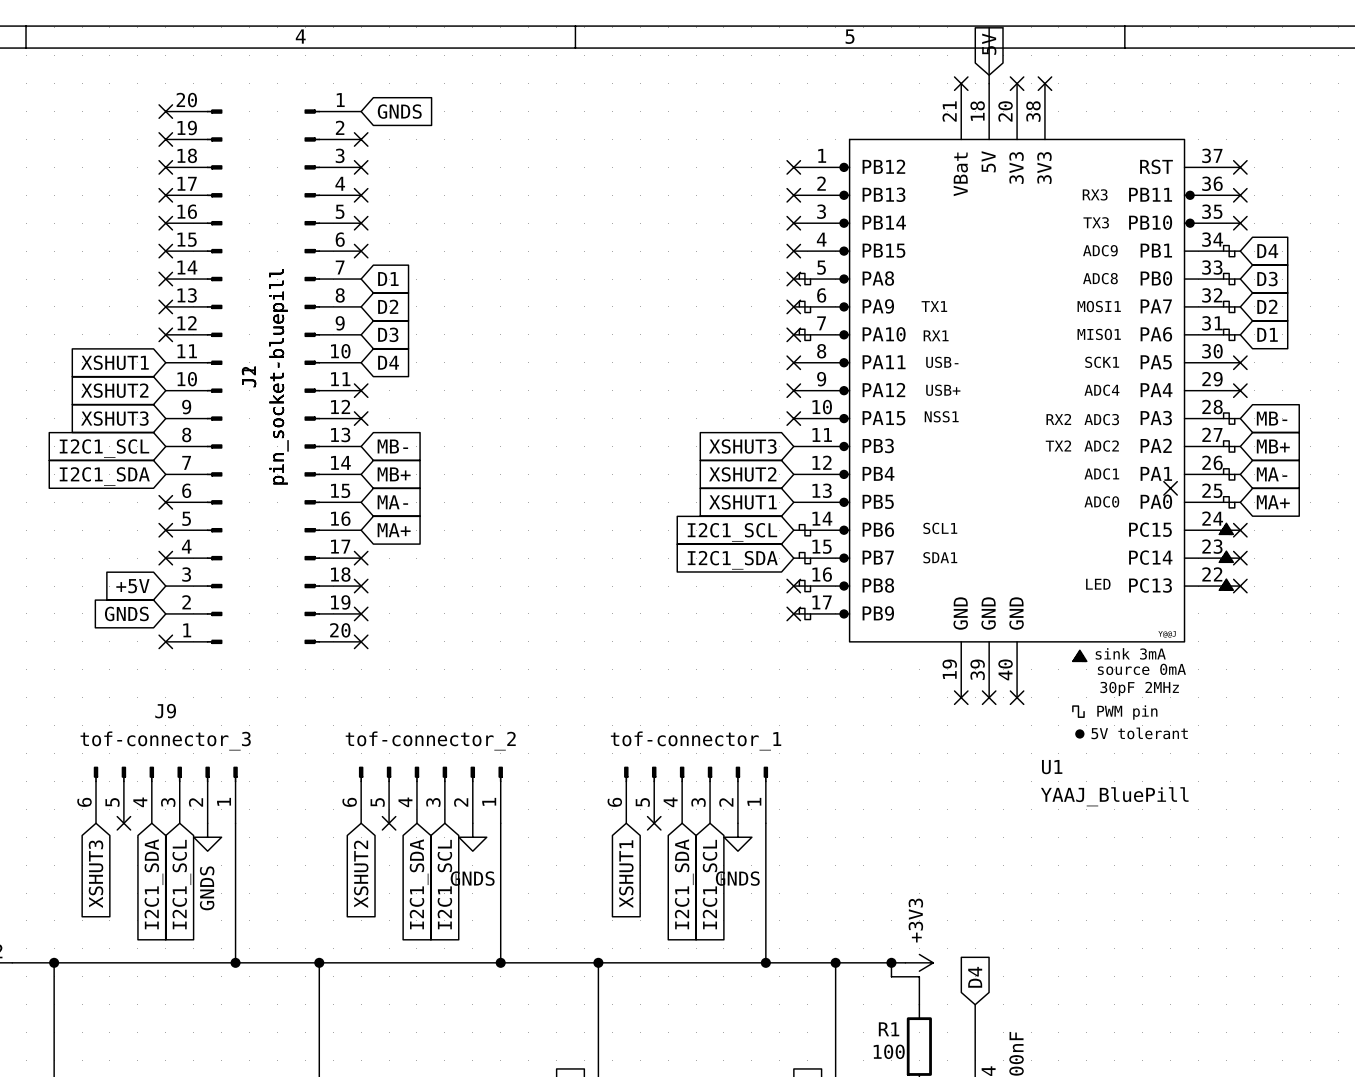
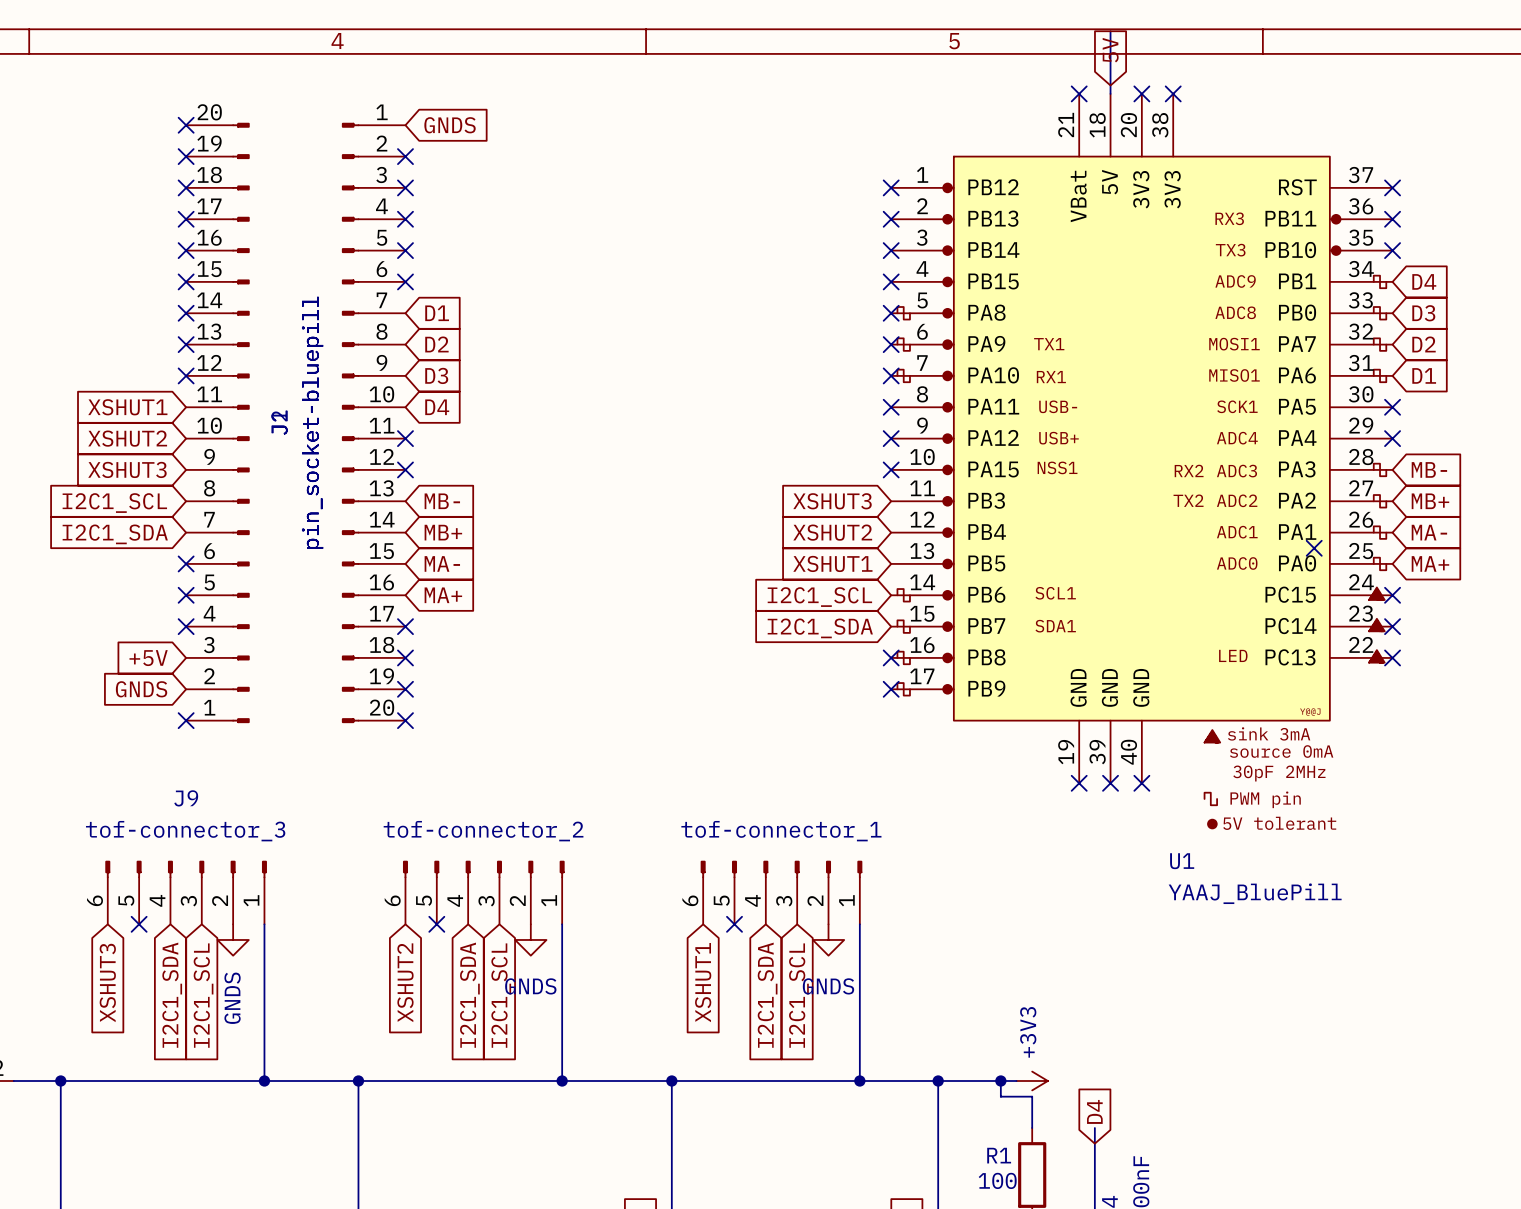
global label position: D4 (975, 977) -> D4 (1094, 1111)

